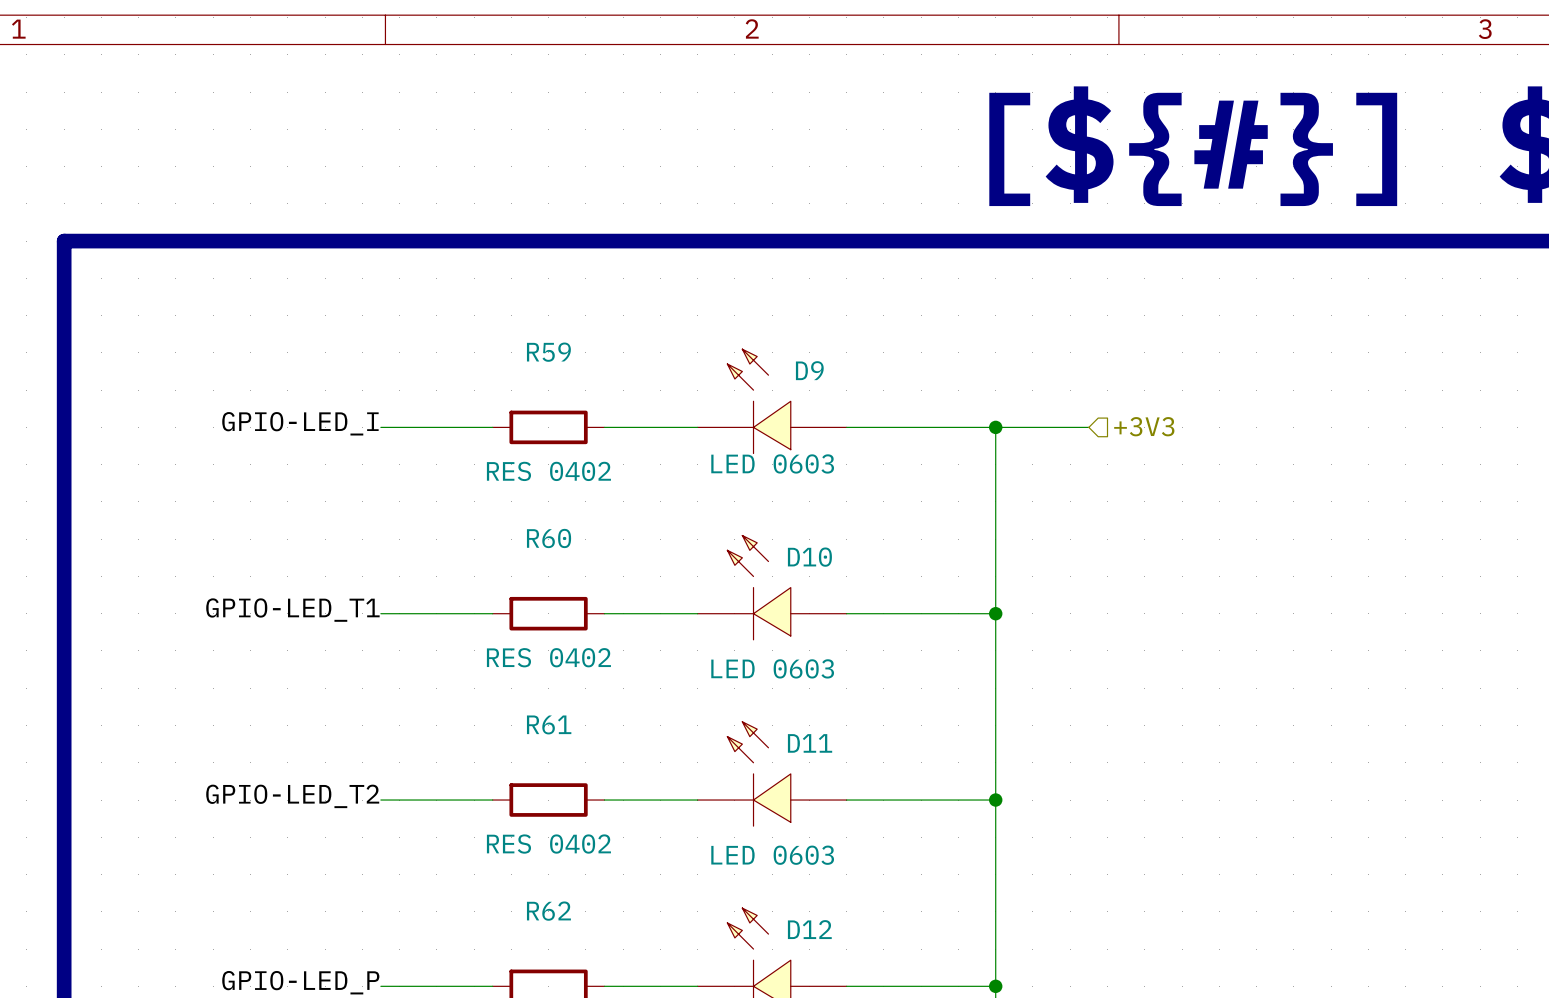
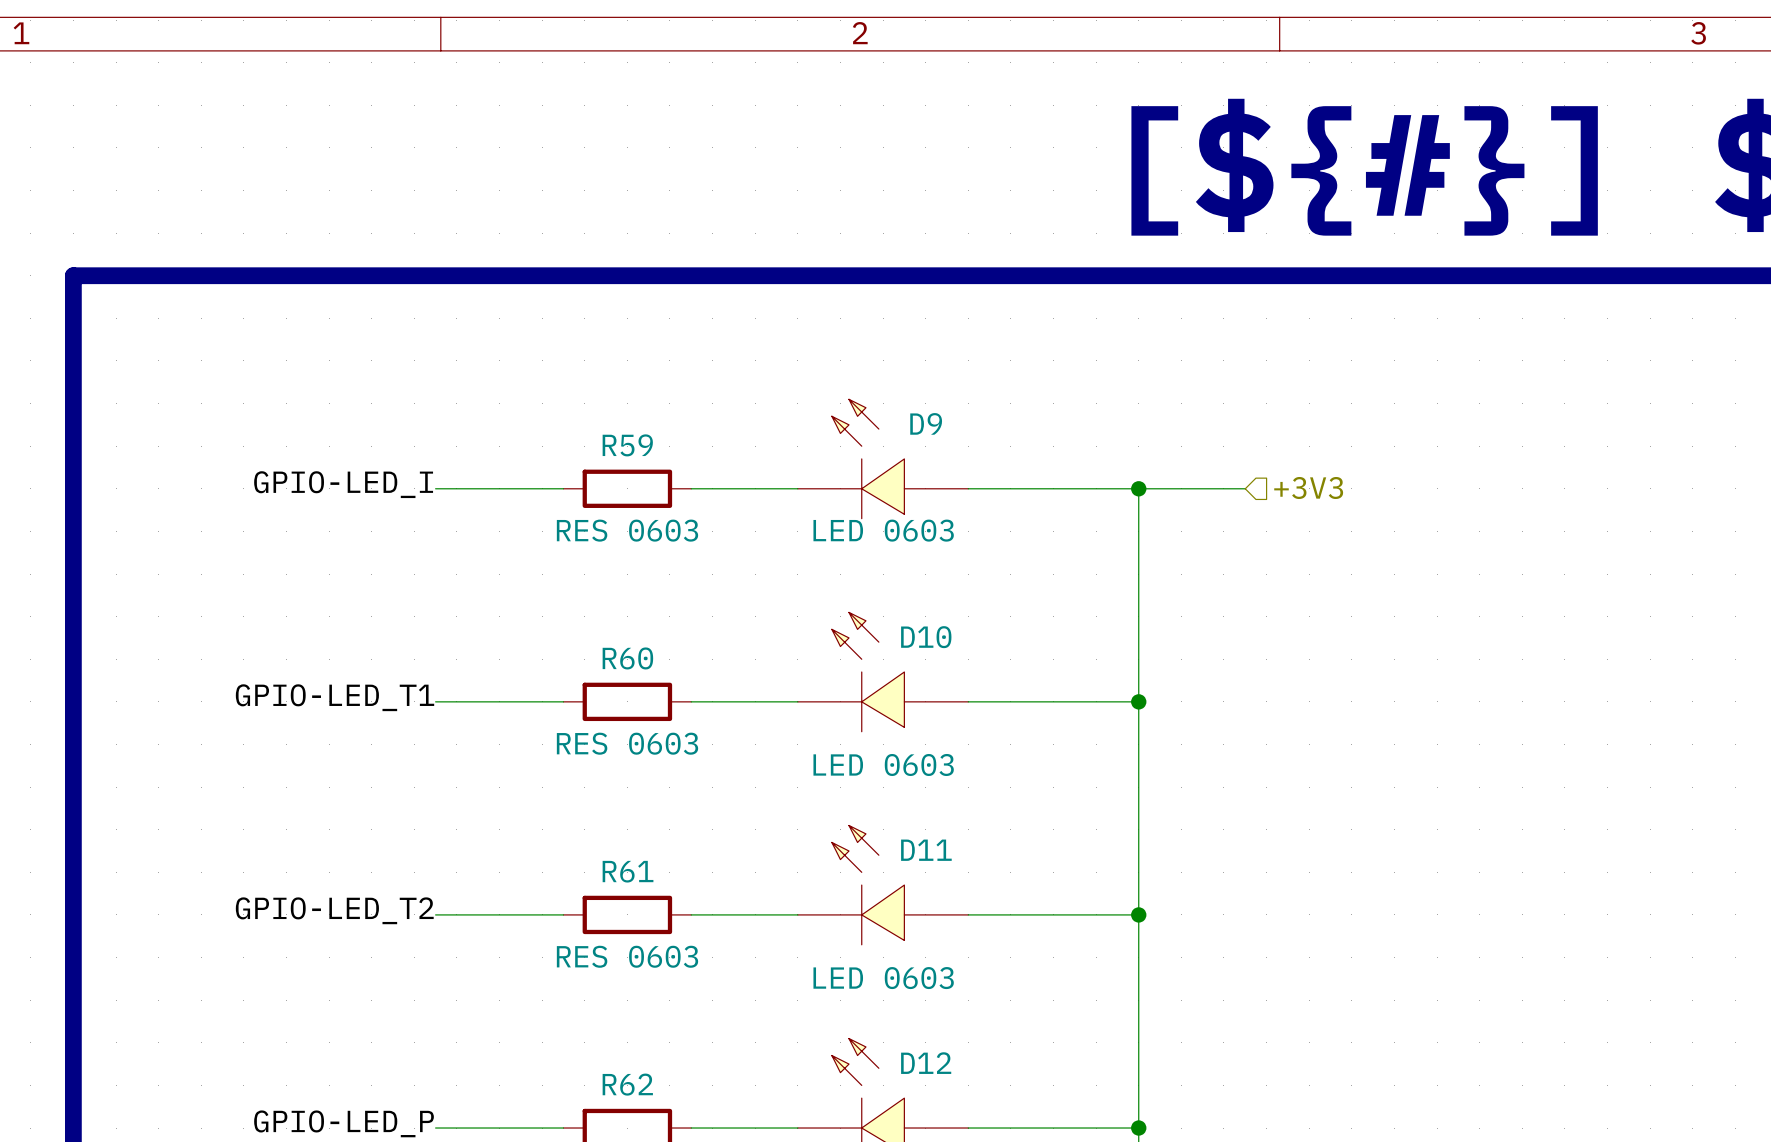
R59 name position: R59 (548, 352) -> R59 (627, 445)
R59 value: RES 0402 (548, 471) -> RES 0603 (627, 530)
R60 name position: R60 (549, 538) -> R60 (627, 658)
R60 value: RES 0402 (548, 657) -> RES 0603 (627, 743)
R61 name position: R61 (549, 724) -> R61 (628, 871)
R61 value: RES 0402 (548, 844) -> RES 0603 (627, 956)
R62 name position: R62 (548, 911) -> R62 (627, 1084)

